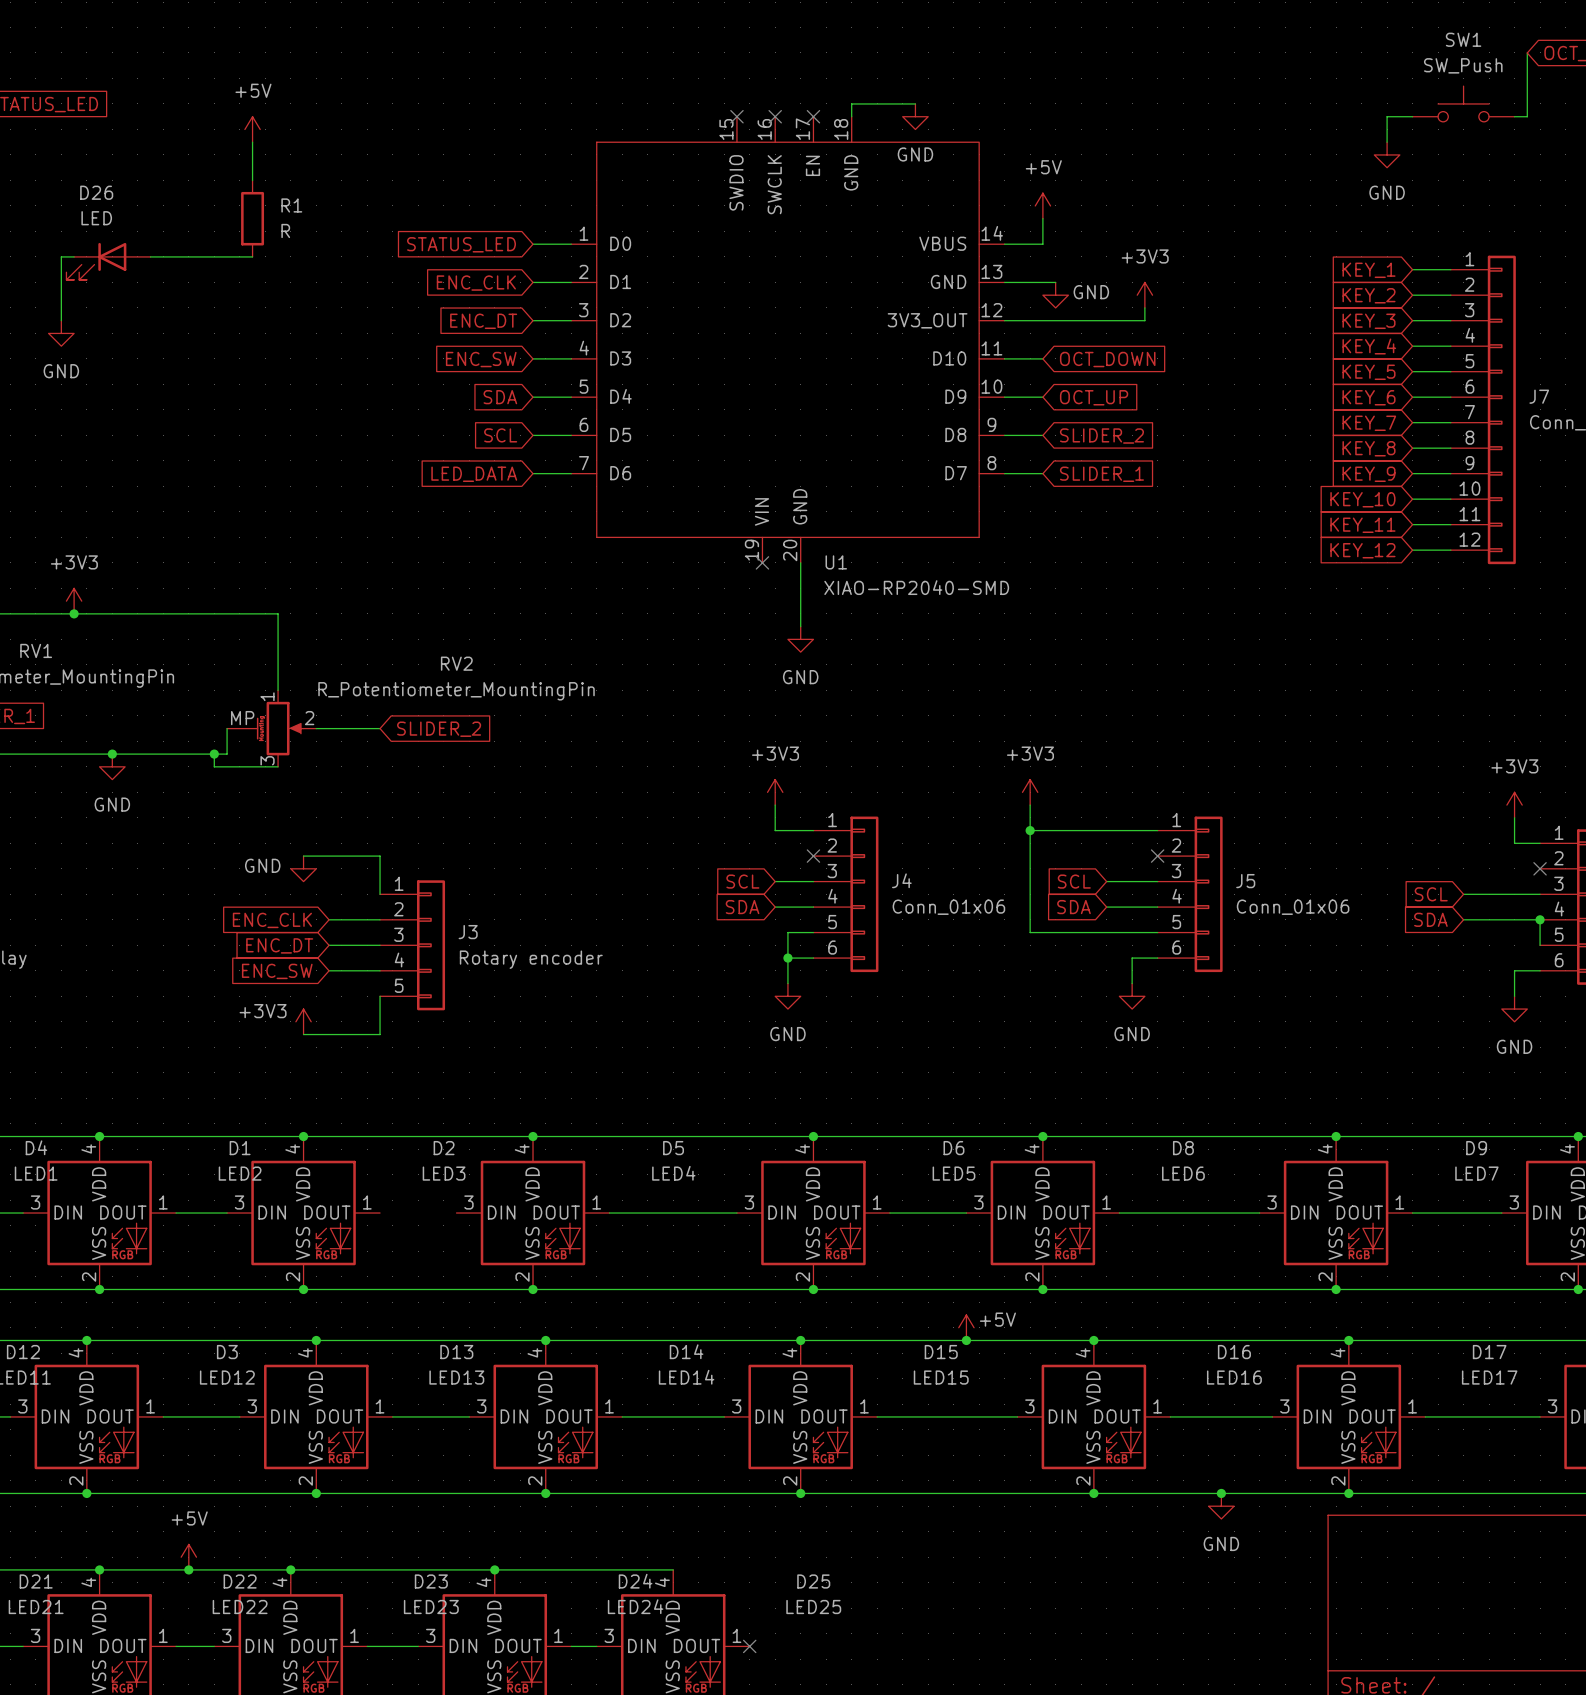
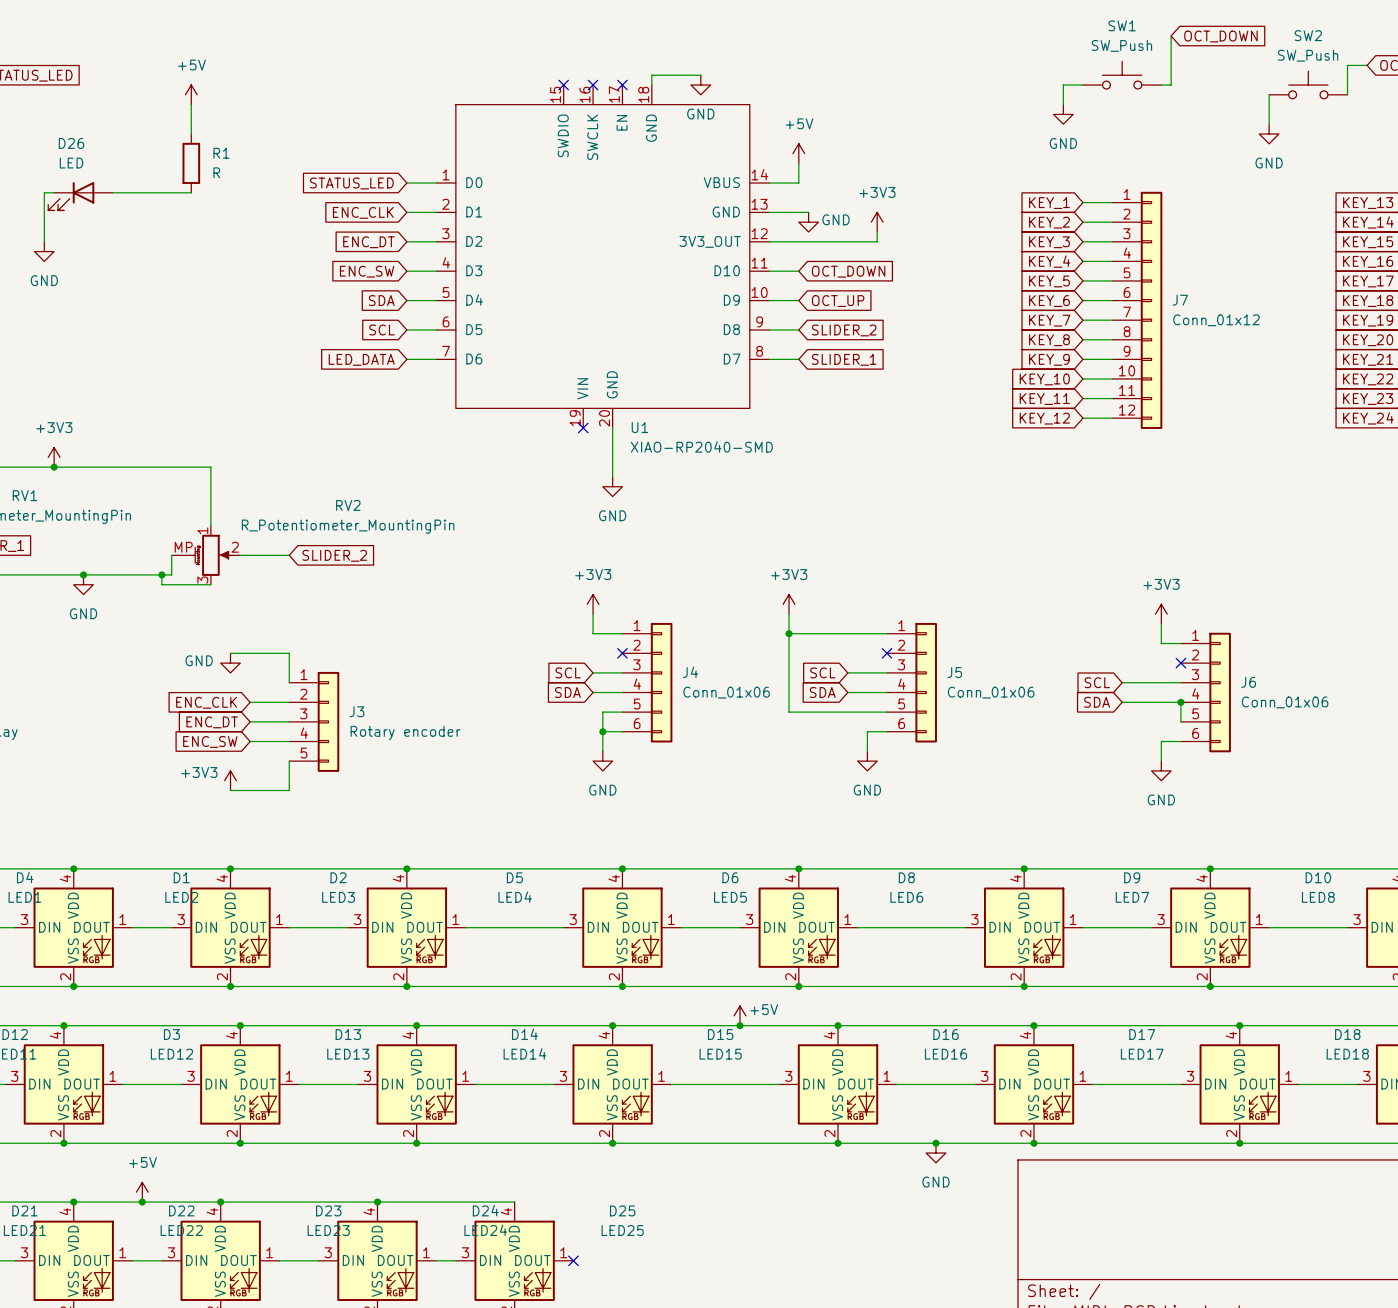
wire: none -> (289, 927) (348, 927)

